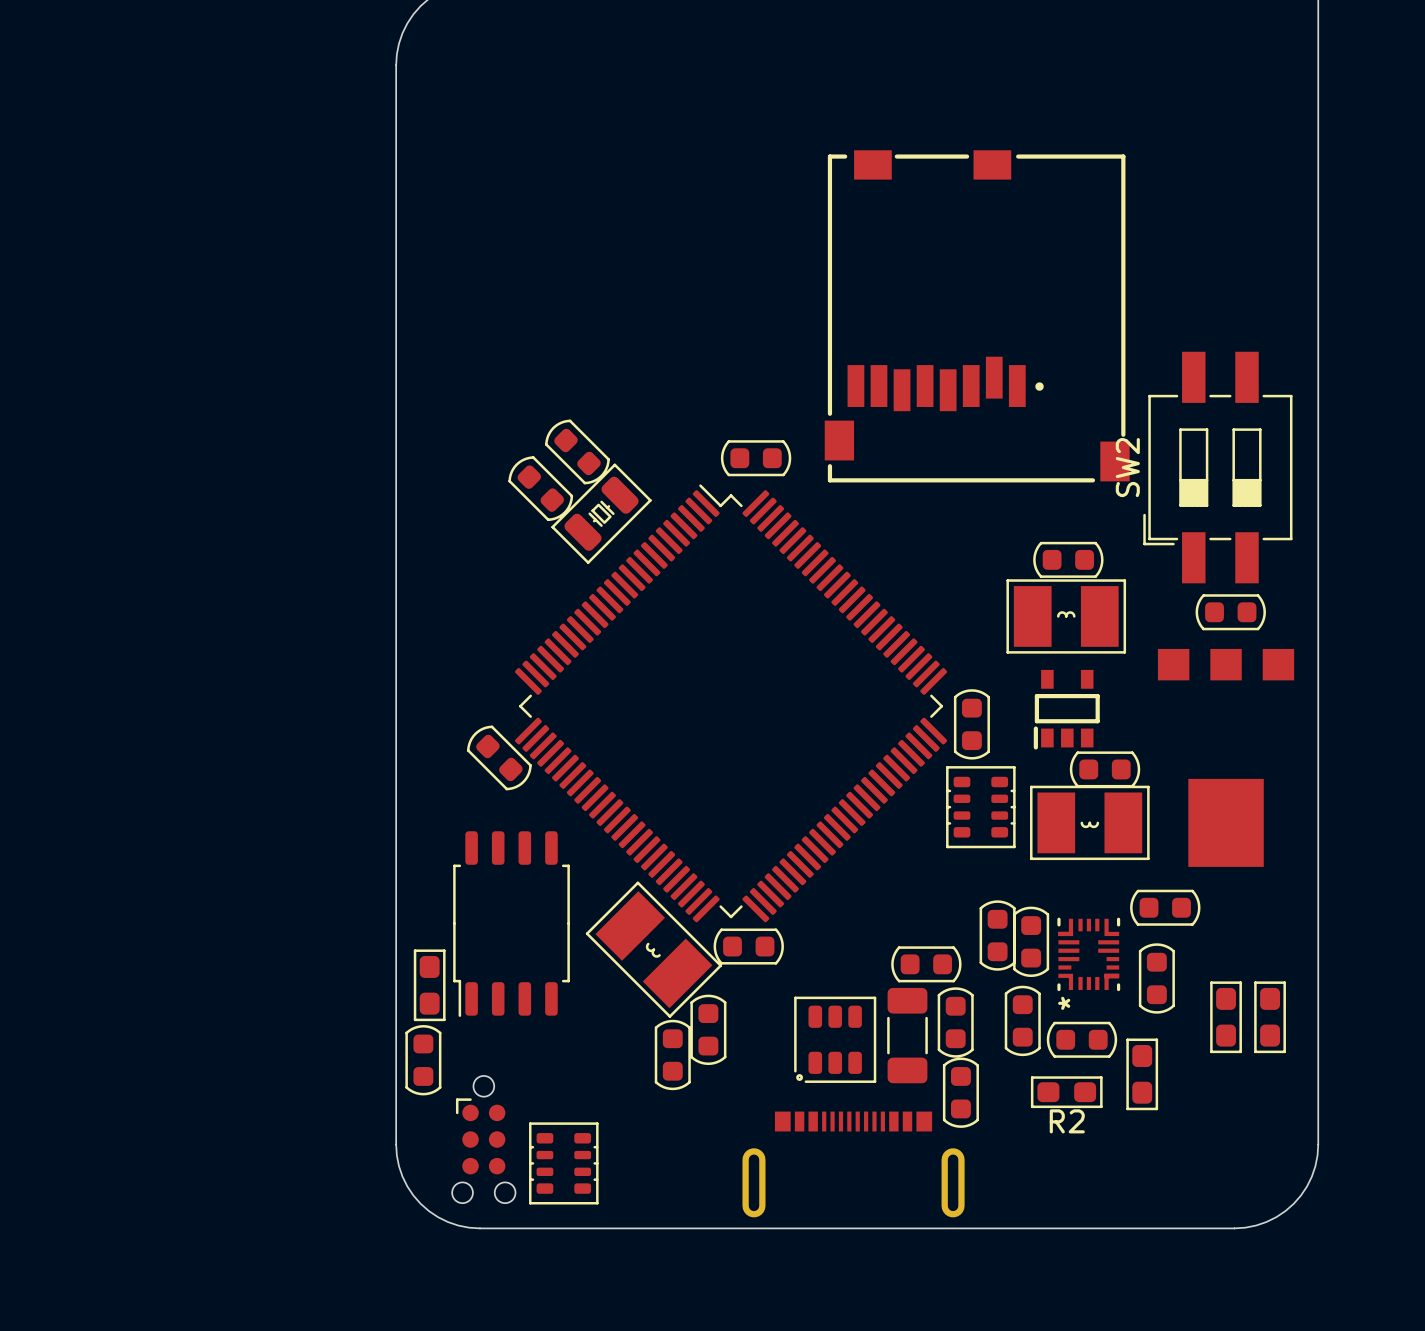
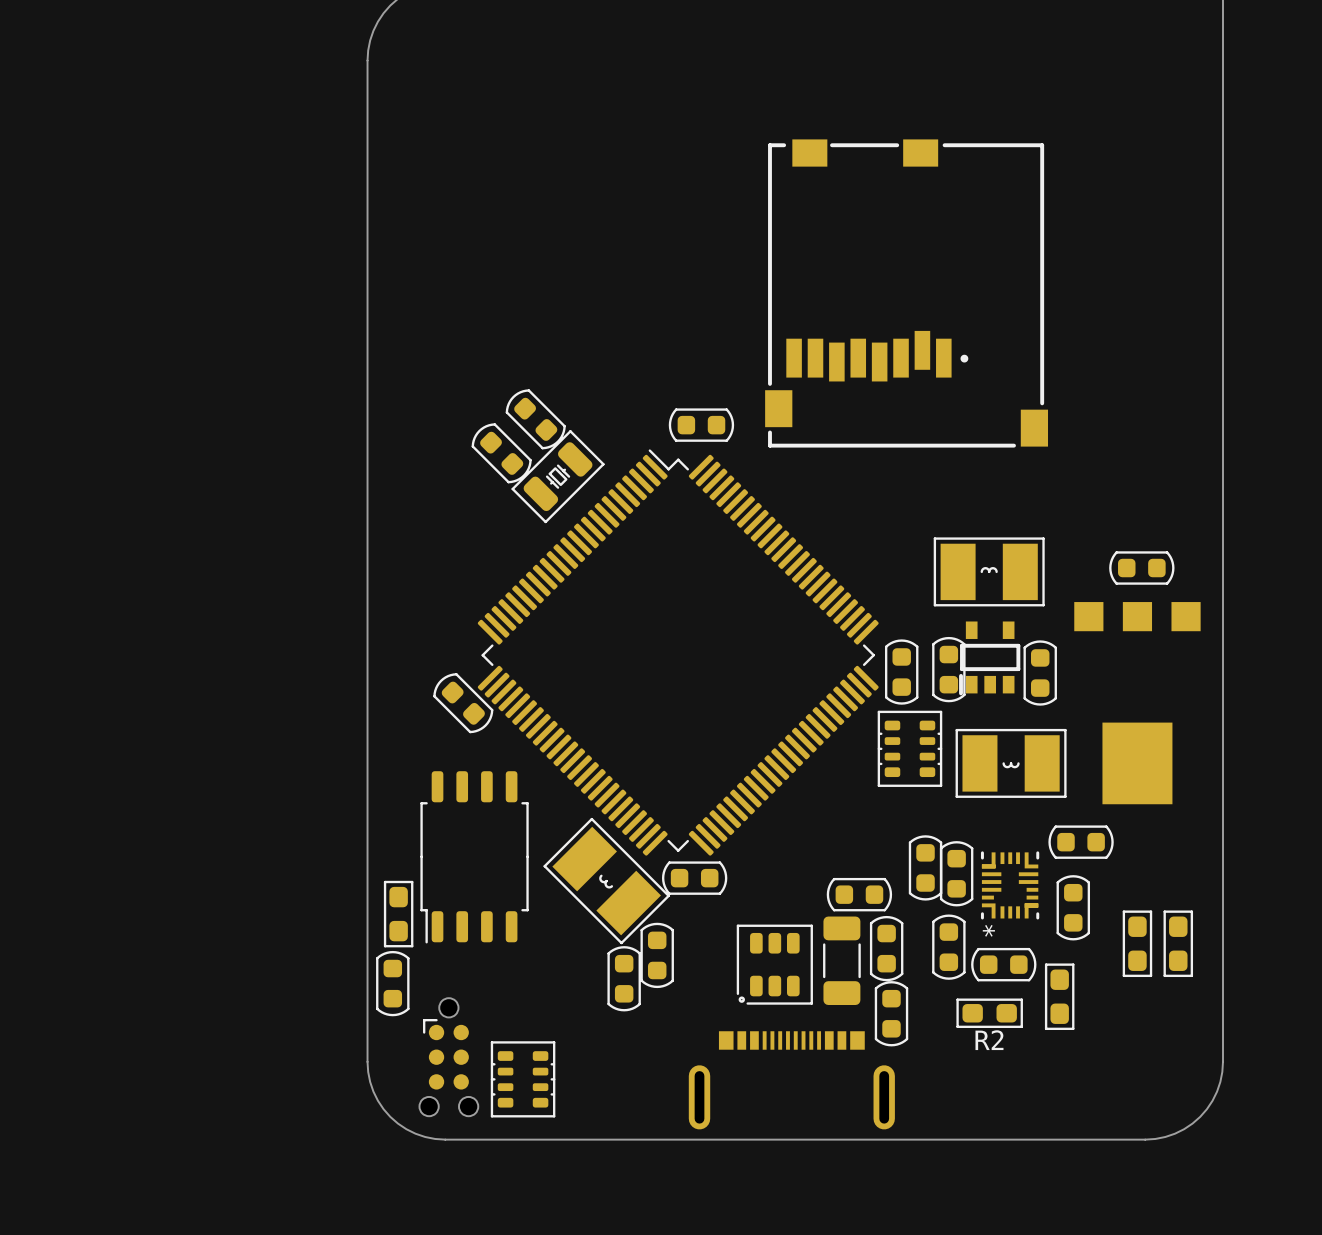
SW2: (1217, 467) -> none
part: (1068, 559) -> none
part: none -> (948, 669)
part rotation: 0° (1105, 769) -> 90° clockwise (1040, 673)
part position: (1105, 769) -> (1040, 673)

